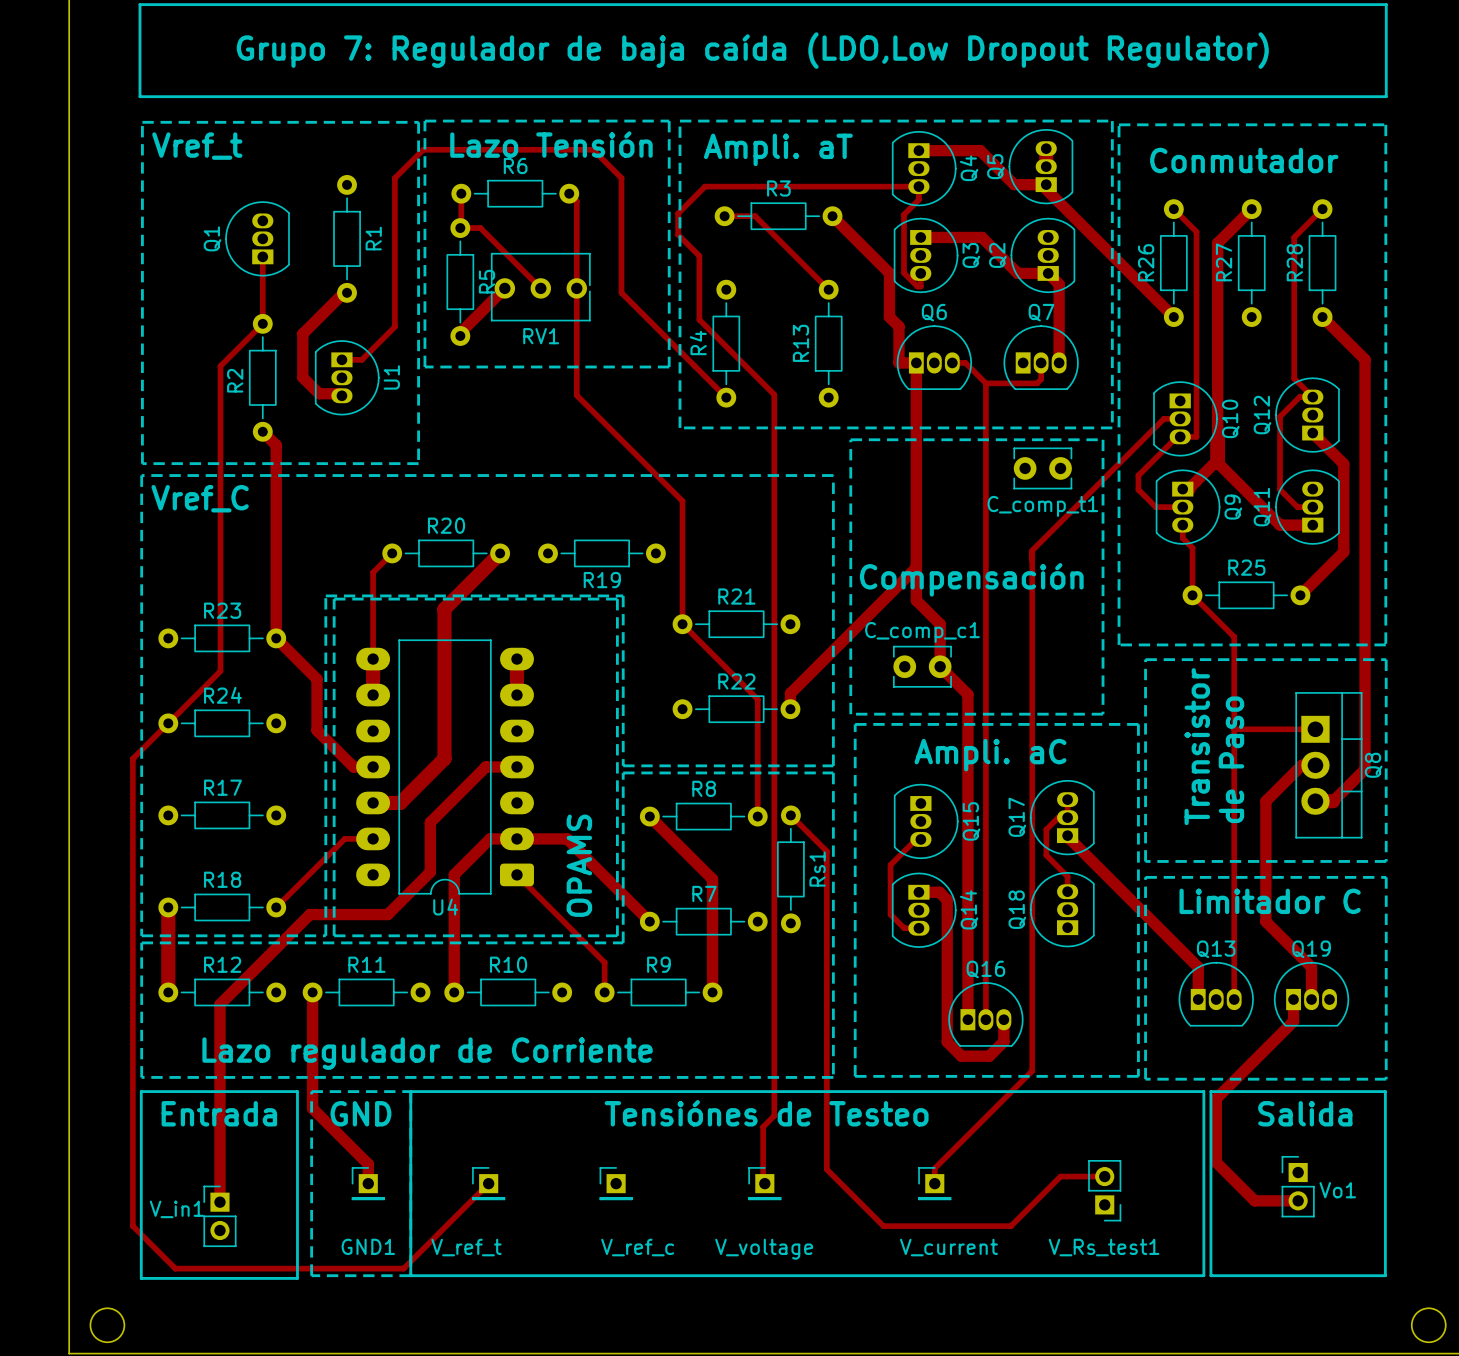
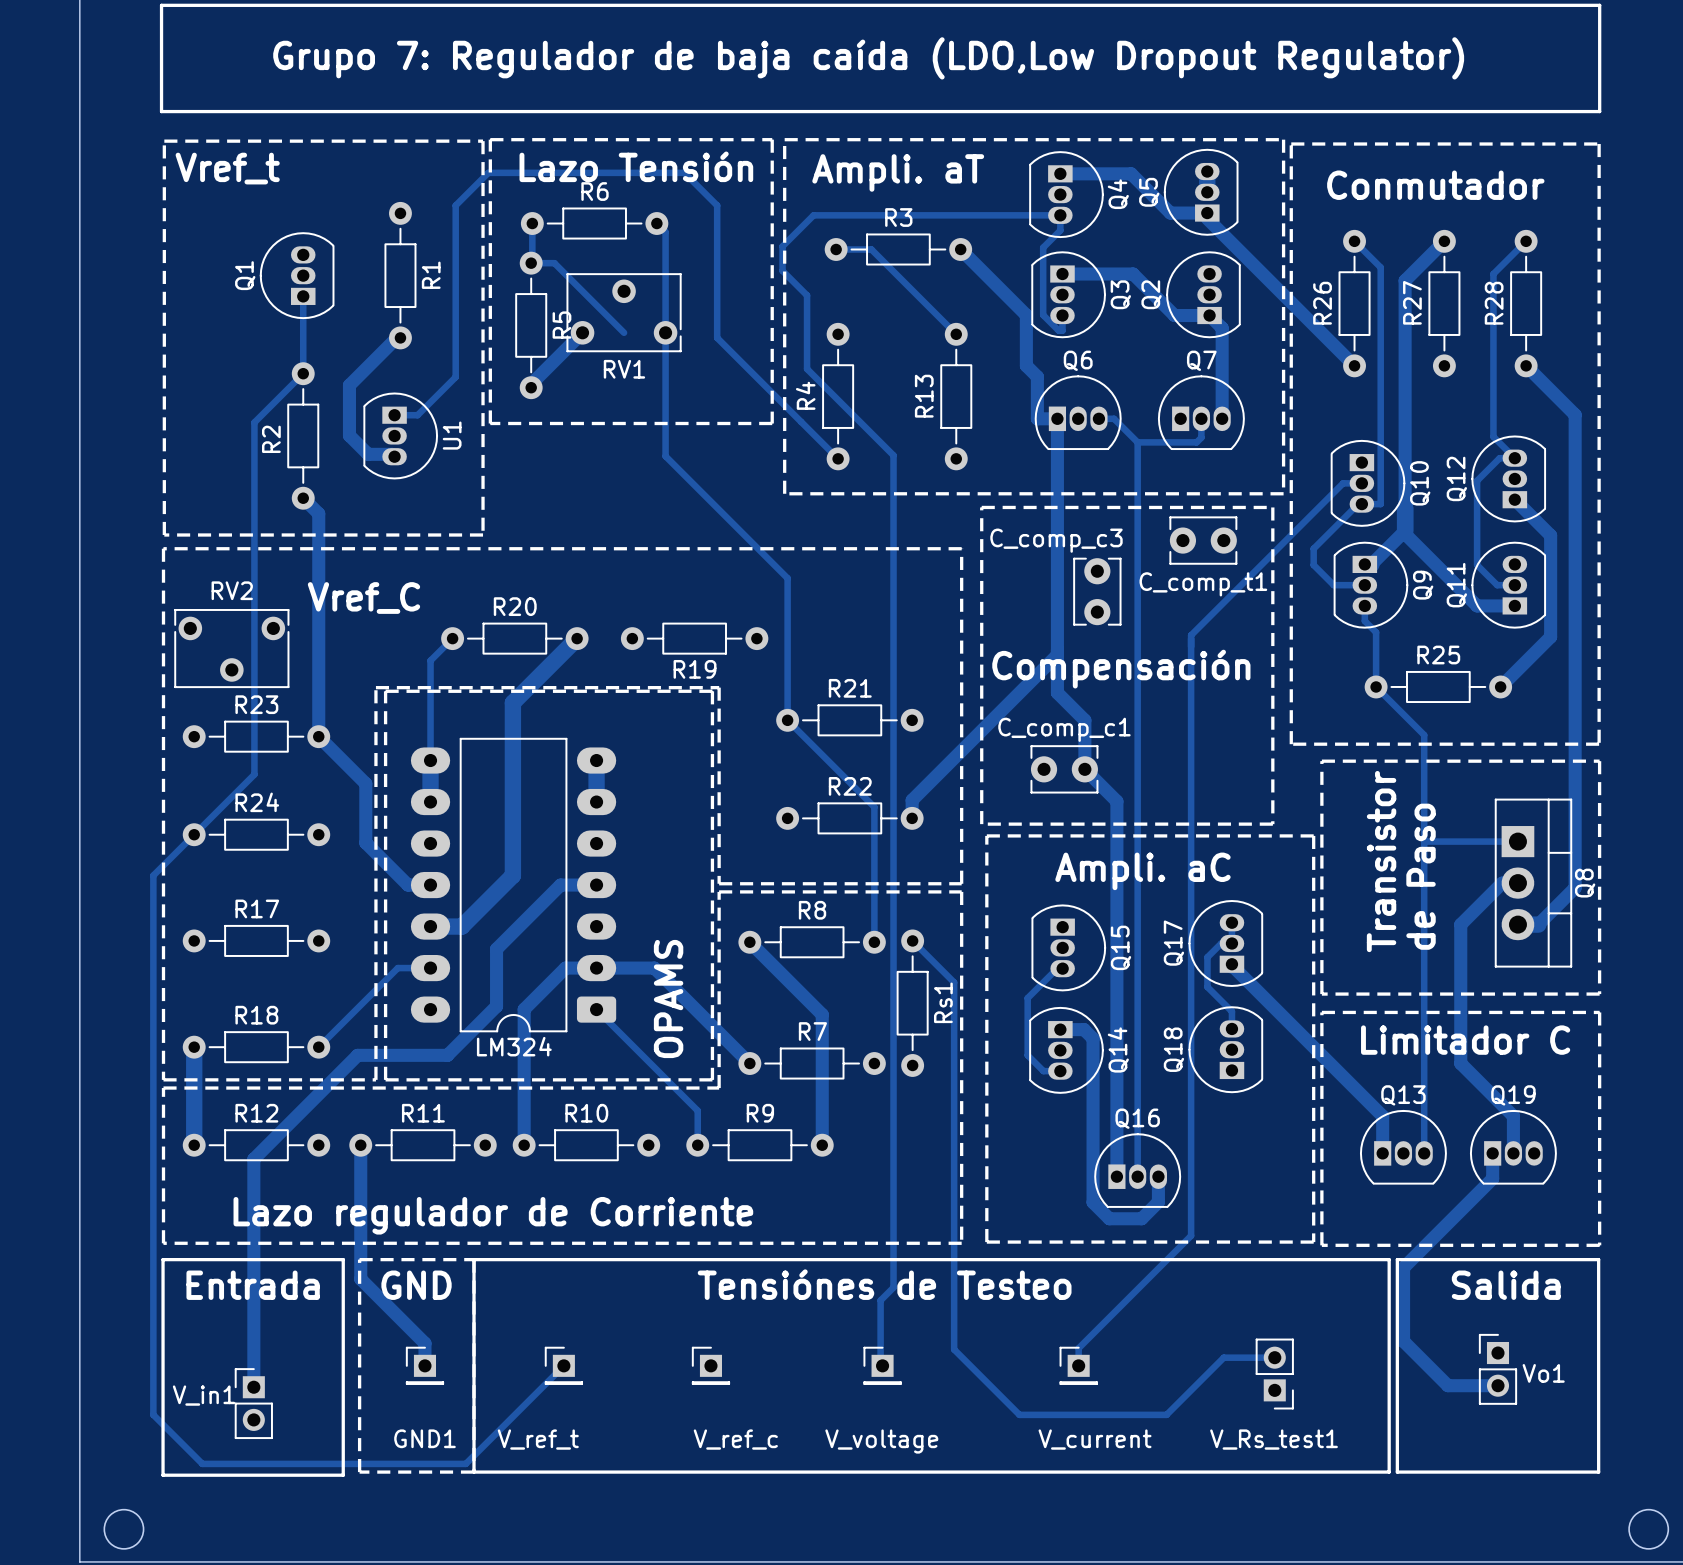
RV1 footprint: [490, 252, 591, 322] -> [566, 273, 682, 353]
text position: Vref_C (200, 498) -> Vref_C (363, 598)
C_comp_c3: none -> (1097, 591)
RV2: none -> (231, 648)
U4 name: U4 (445, 907) -> LM324 (514, 1046)

